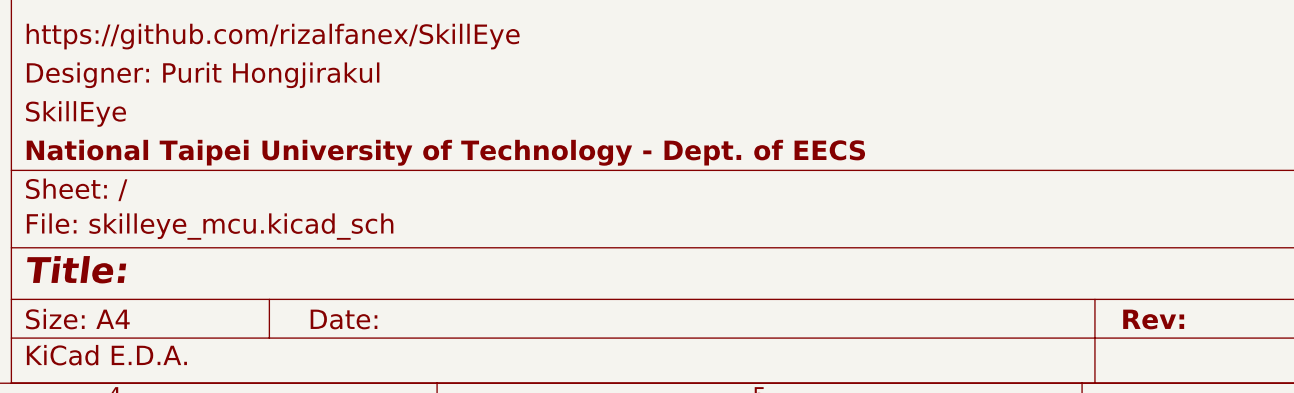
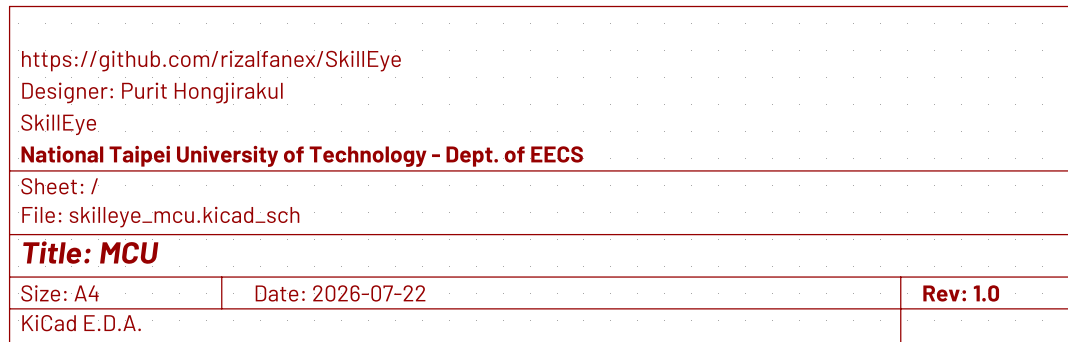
title block: Title: (76, 269) -> Title: MCU (90, 252)
title block: Date: (344, 319) -> Date: 2026-07-22 (340, 293)
title block: Rev: (1153, 319) -> Rev: 1.0 (961, 293)

